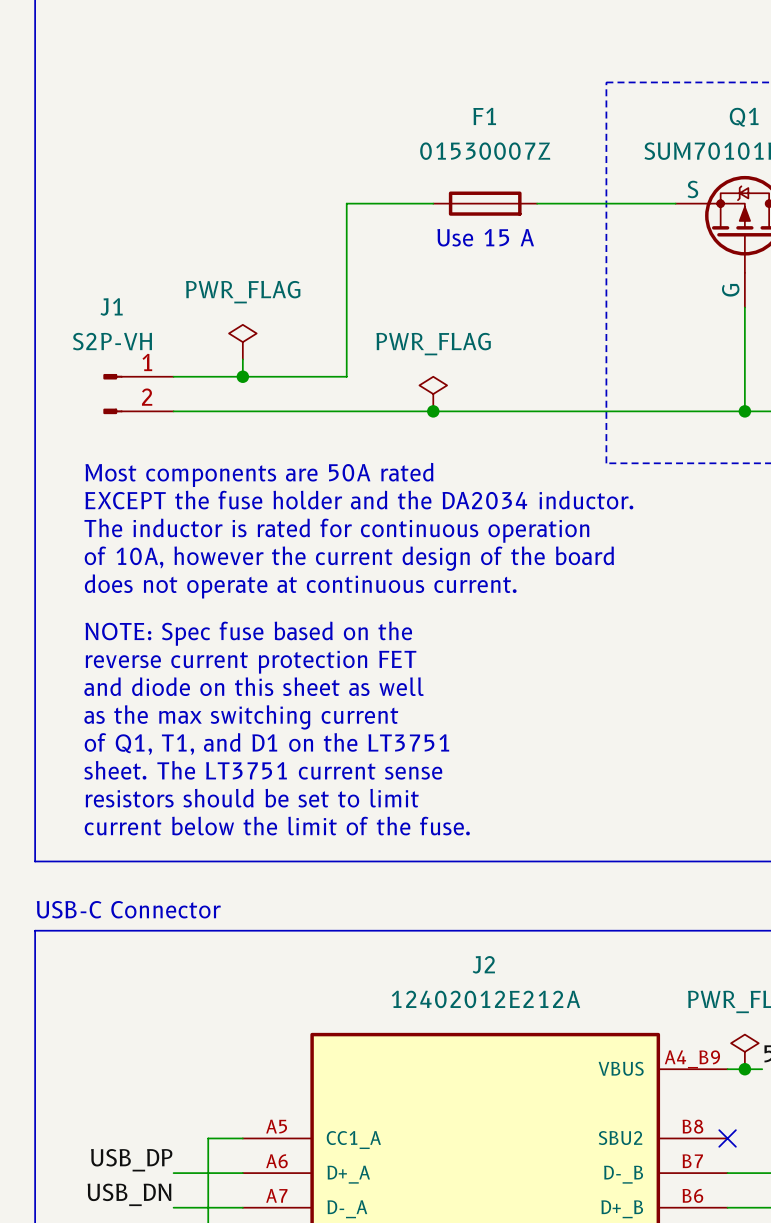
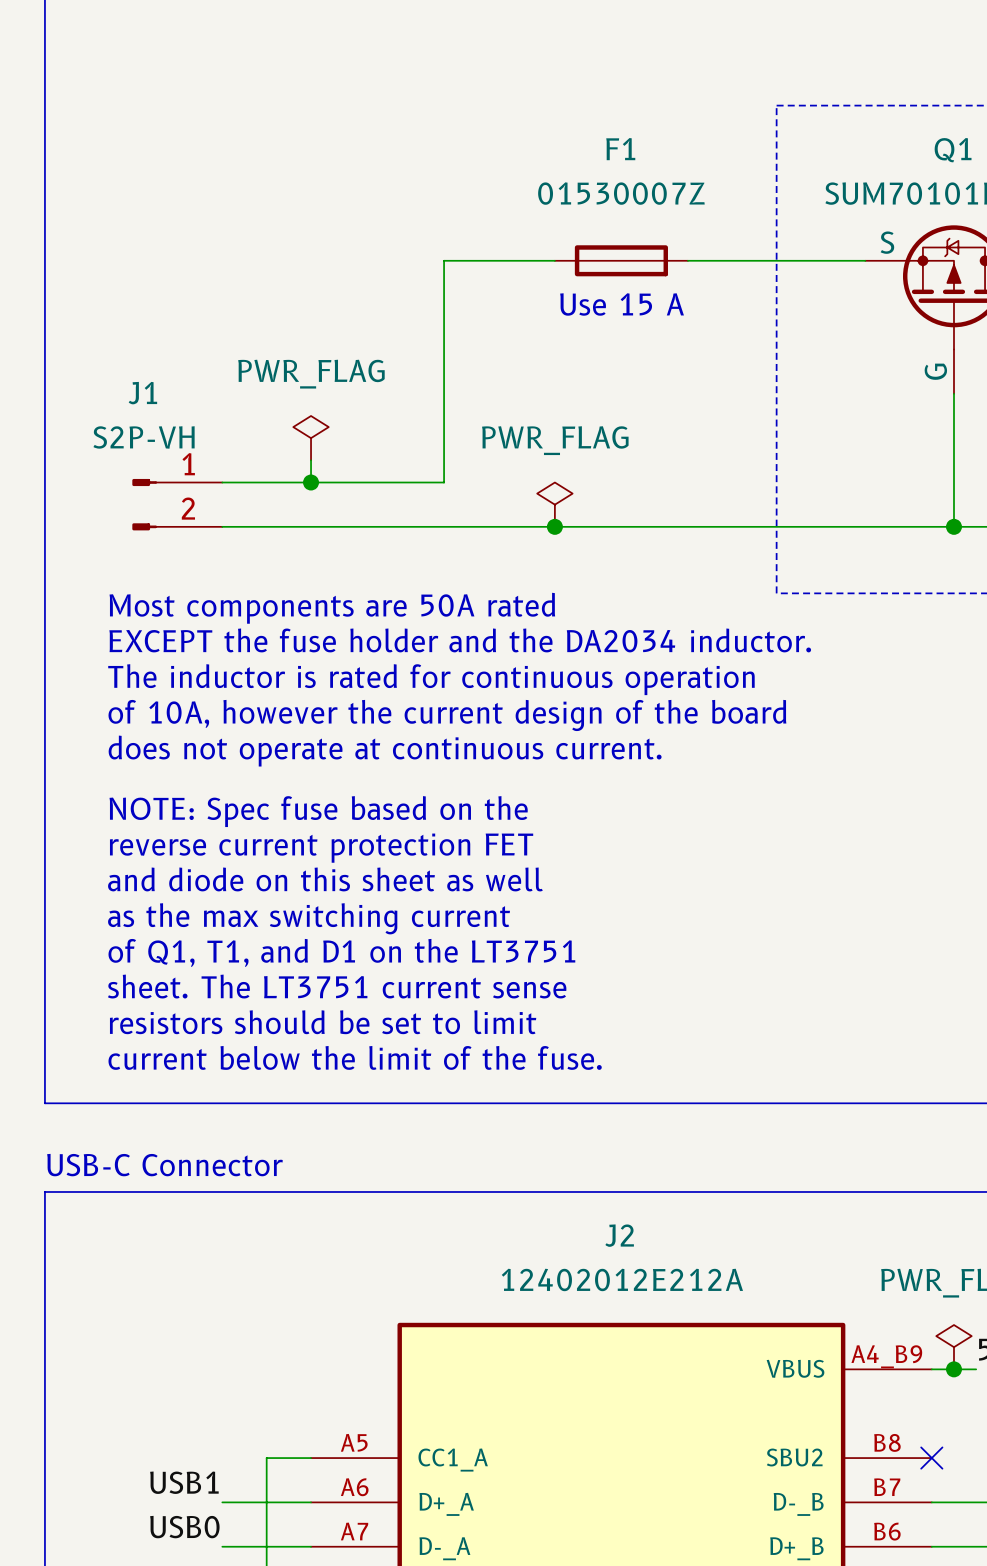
label: USB_DP (131, 1160) -> USB1 (184, 1482)
label: USB_DN (129, 1194) -> USB0 (184, 1527)

